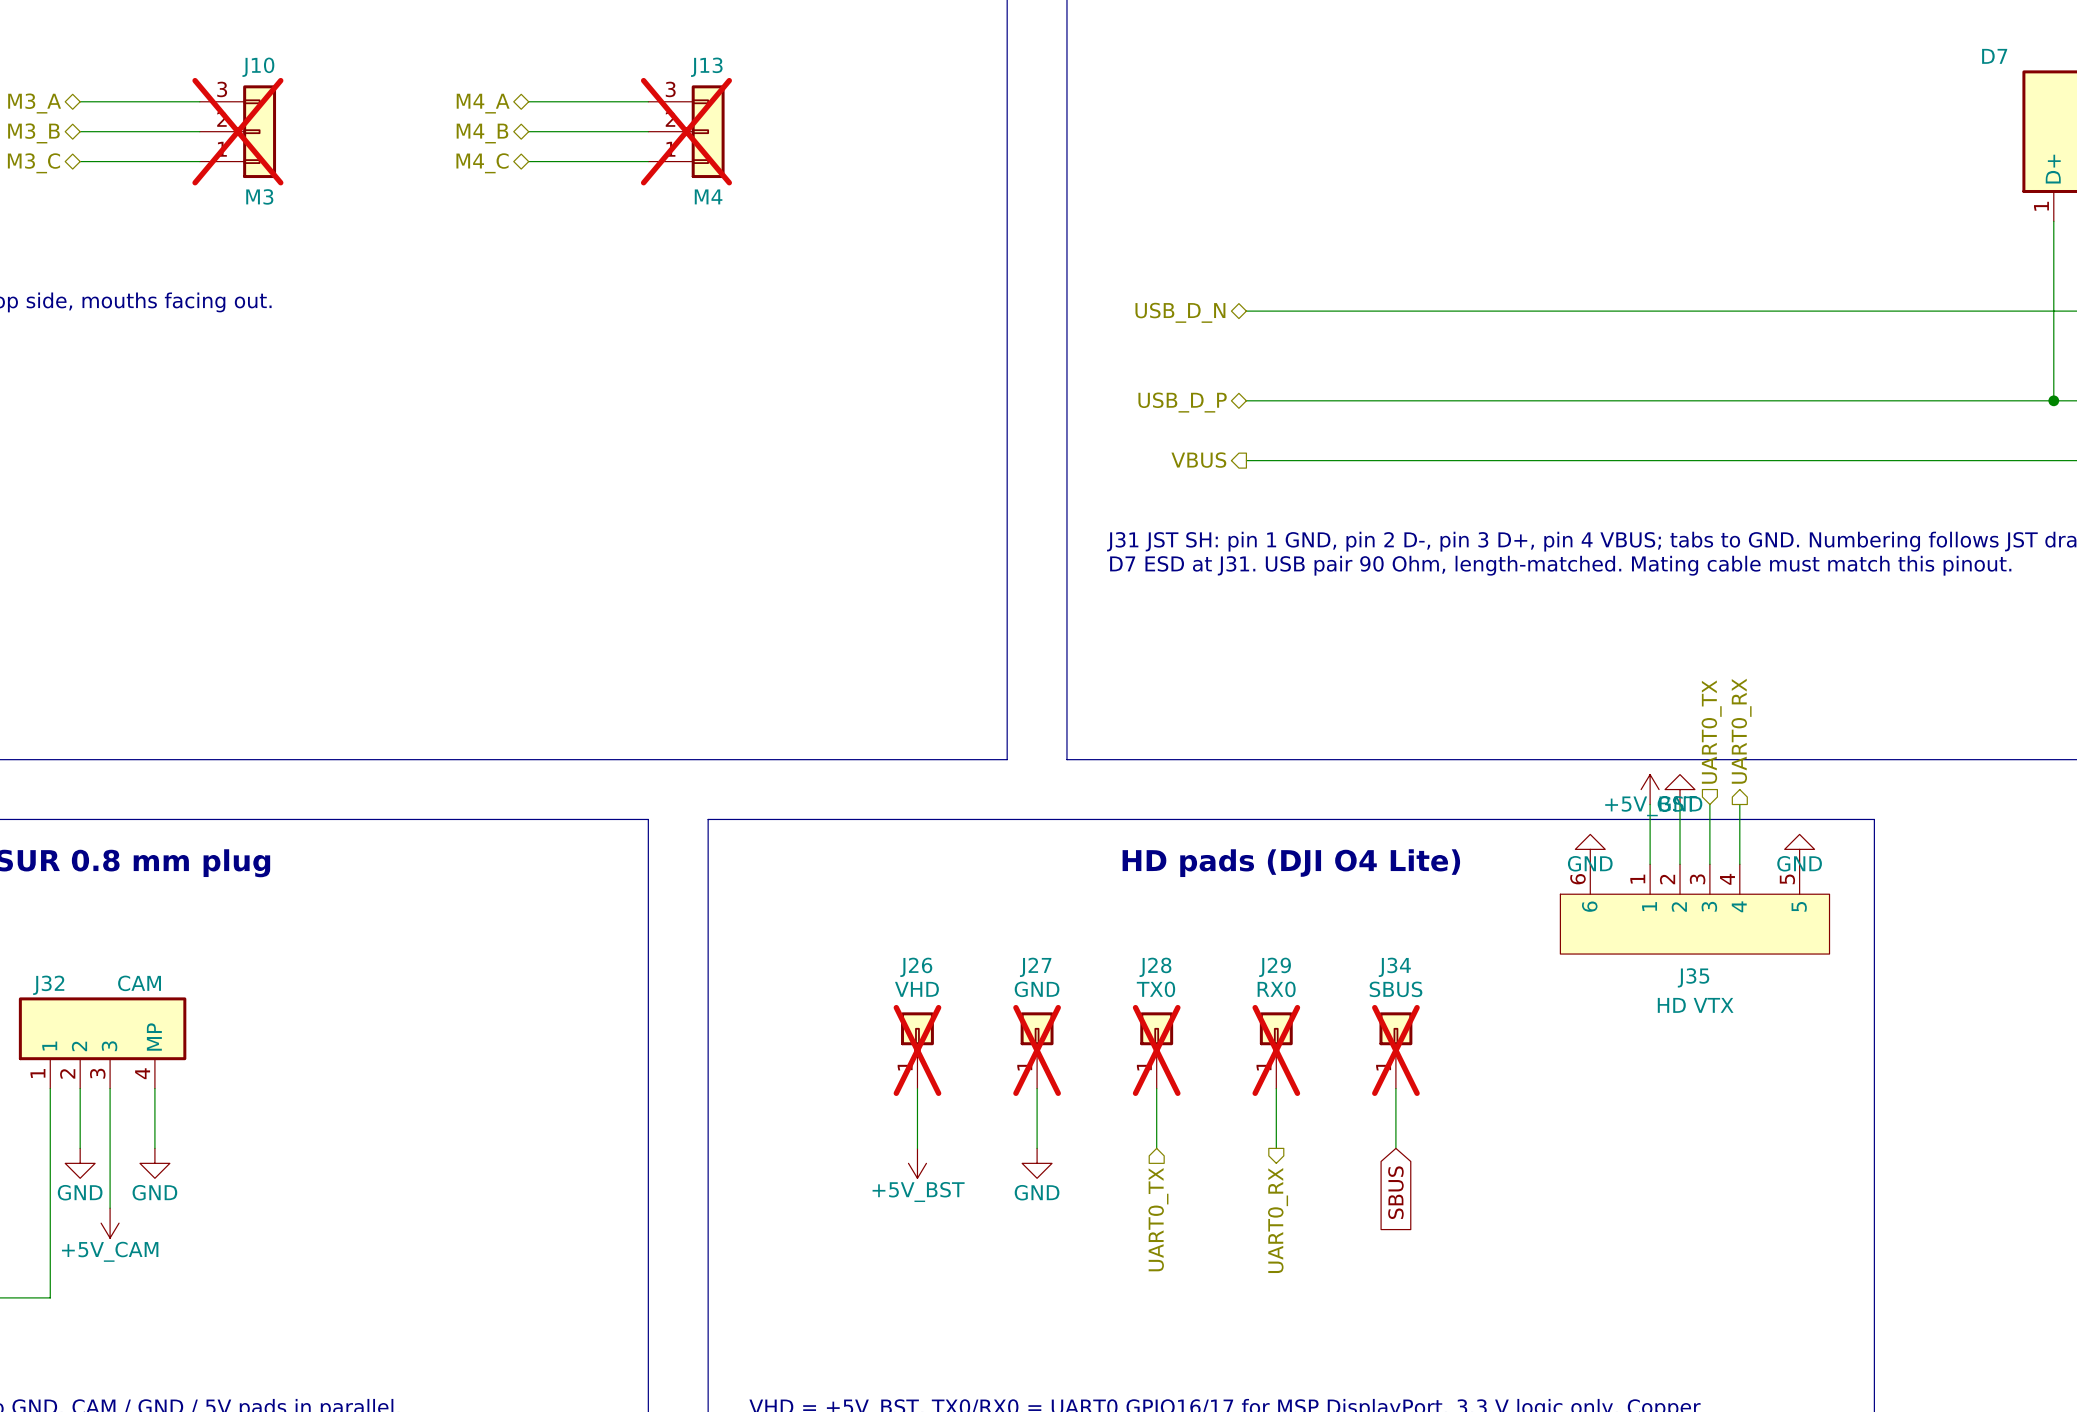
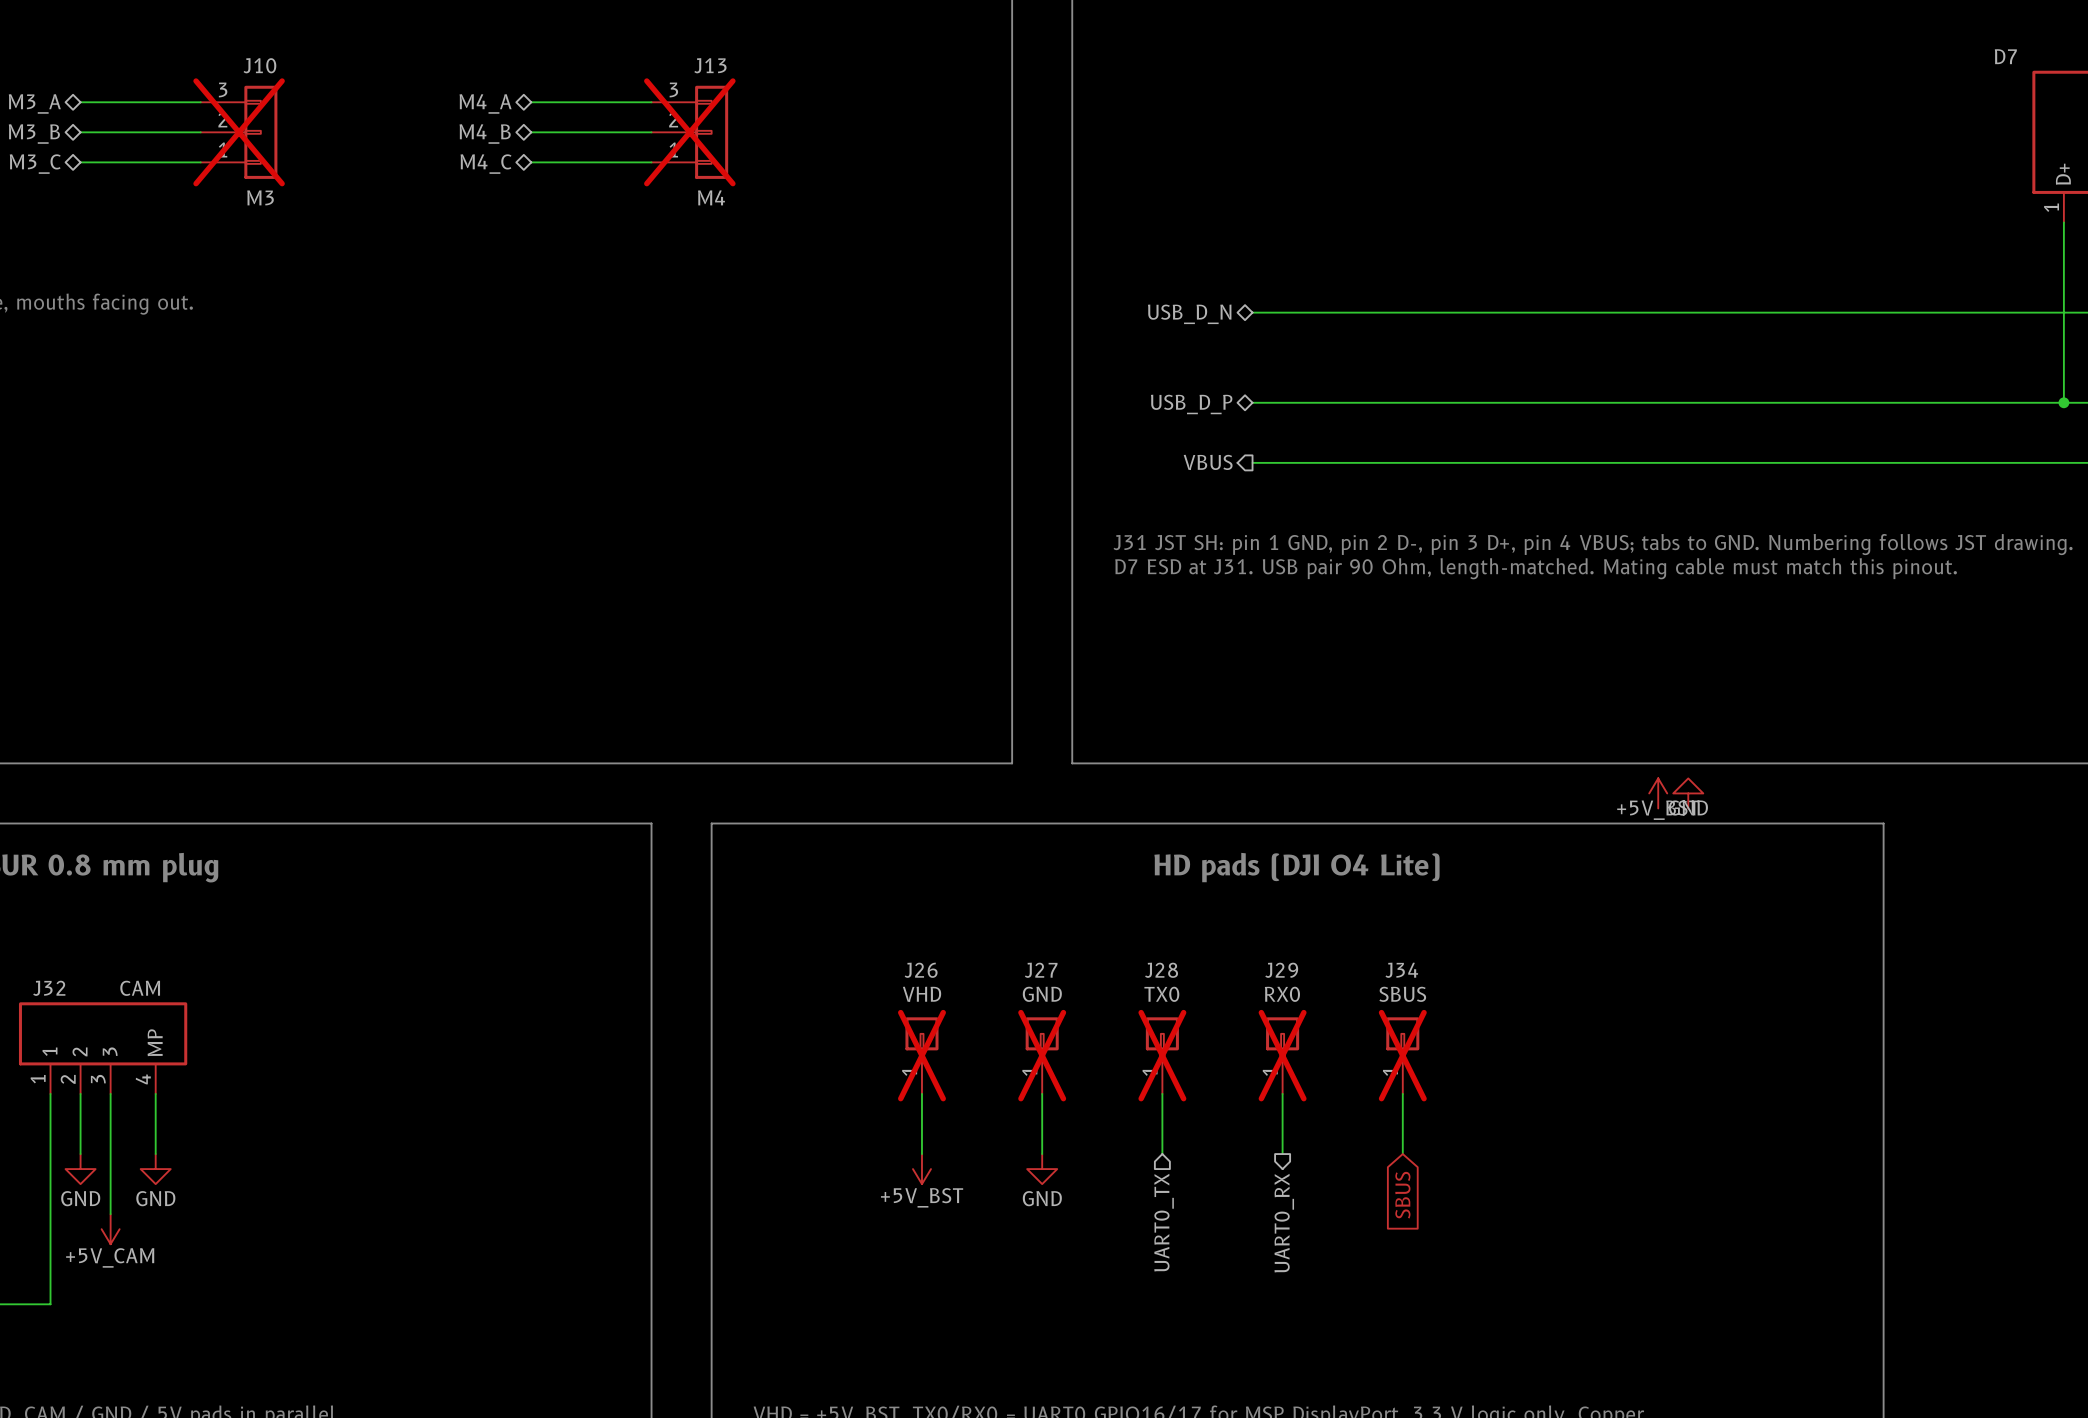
hierarchical label: UART0_RX (1741, 731) -> none
hierarchical label: UART0_TX (1711, 732) -> none
wire: (1650, 804) (1650, 864) -> none
wire: (1680, 804) (1680, 864) -> none
wire: (1709, 804) (1709, 864) -> none
wire: (1739, 804) (1739, 864) -> none
power symbol: GND (1590, 849) -> none
power symbol: GND (1799, 849) -> none
J35: HD VTX (1694, 909) -> none

